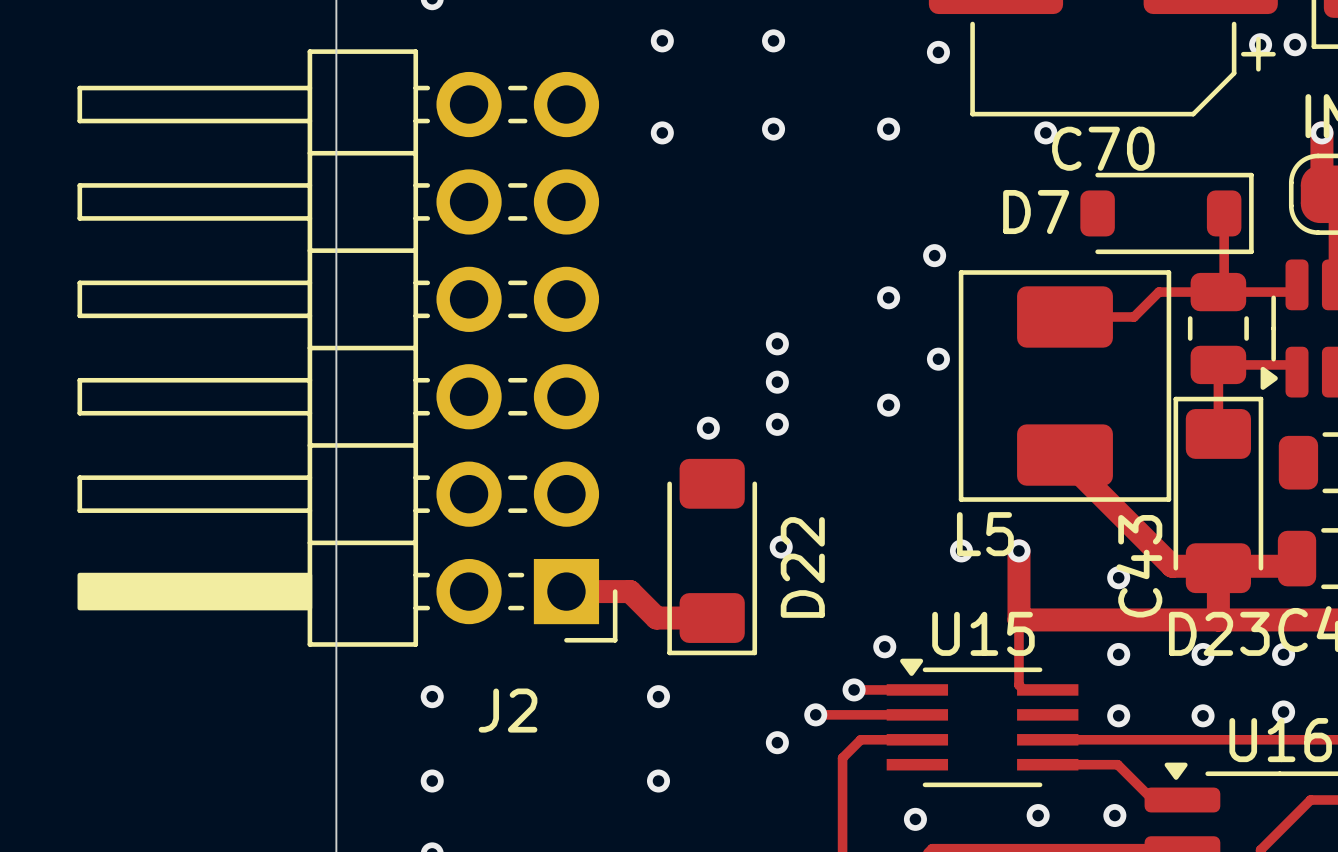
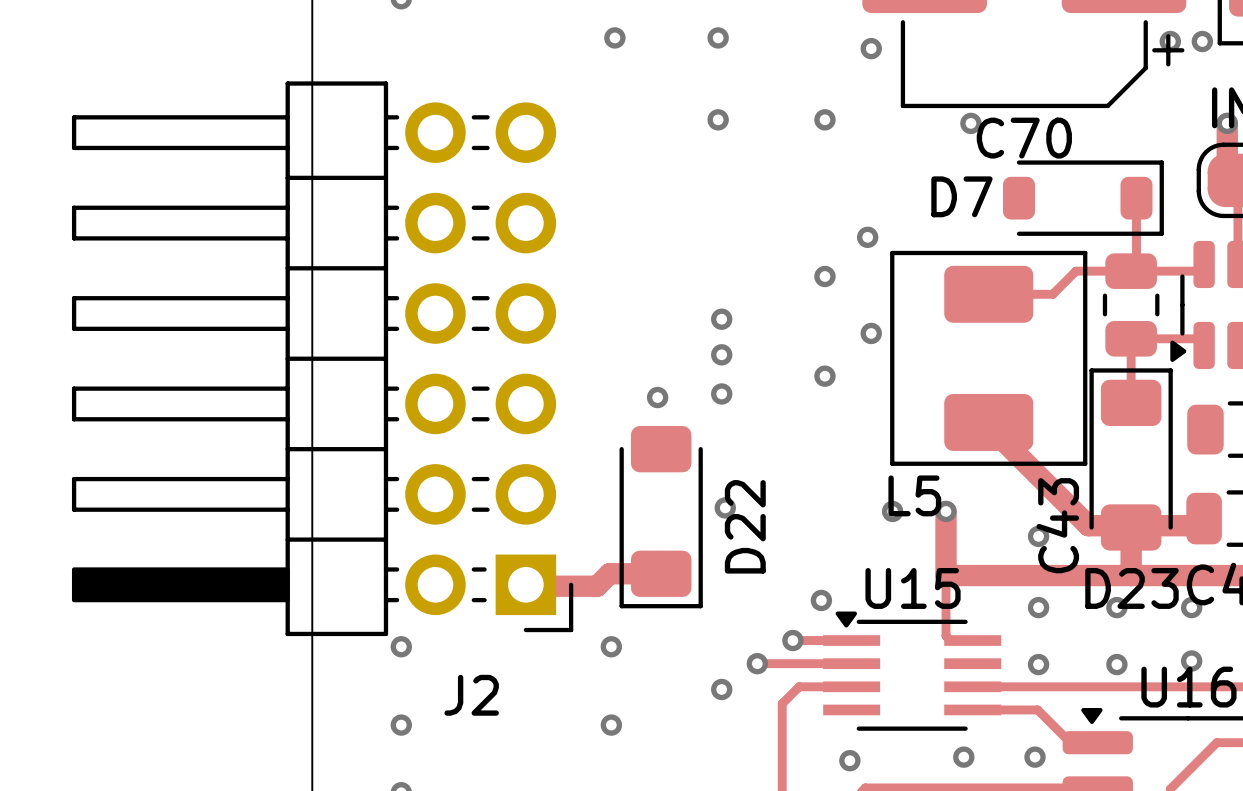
via: (662, 132) -> none
J2 position: (347, 348) -> (322, 358)
track: (566, 591) (630, 591) (656, 618) -> (525, 584) (597, 586) (609, 573)

